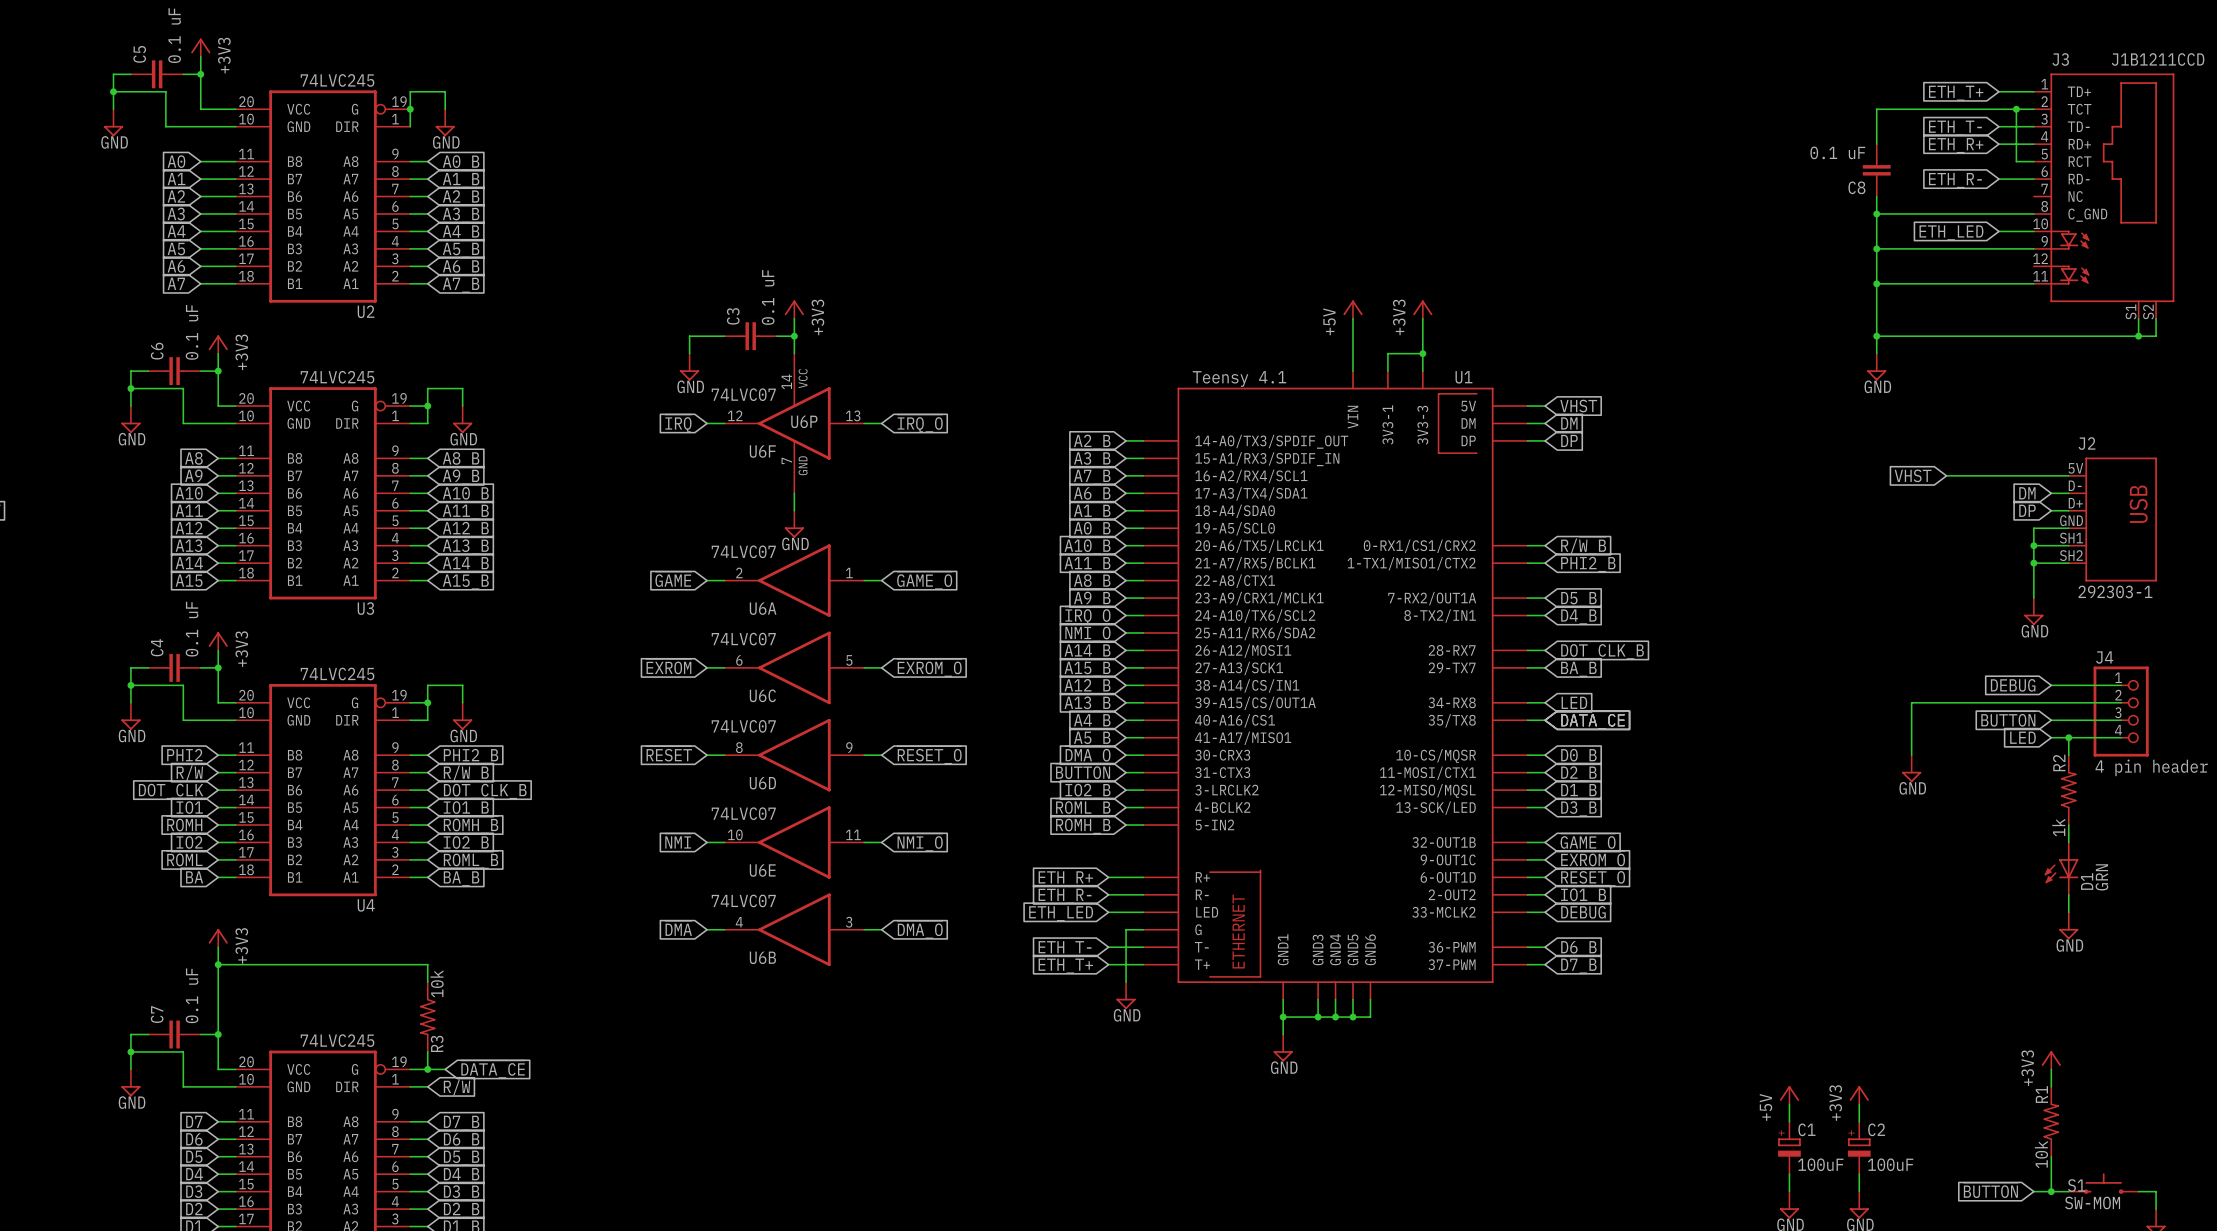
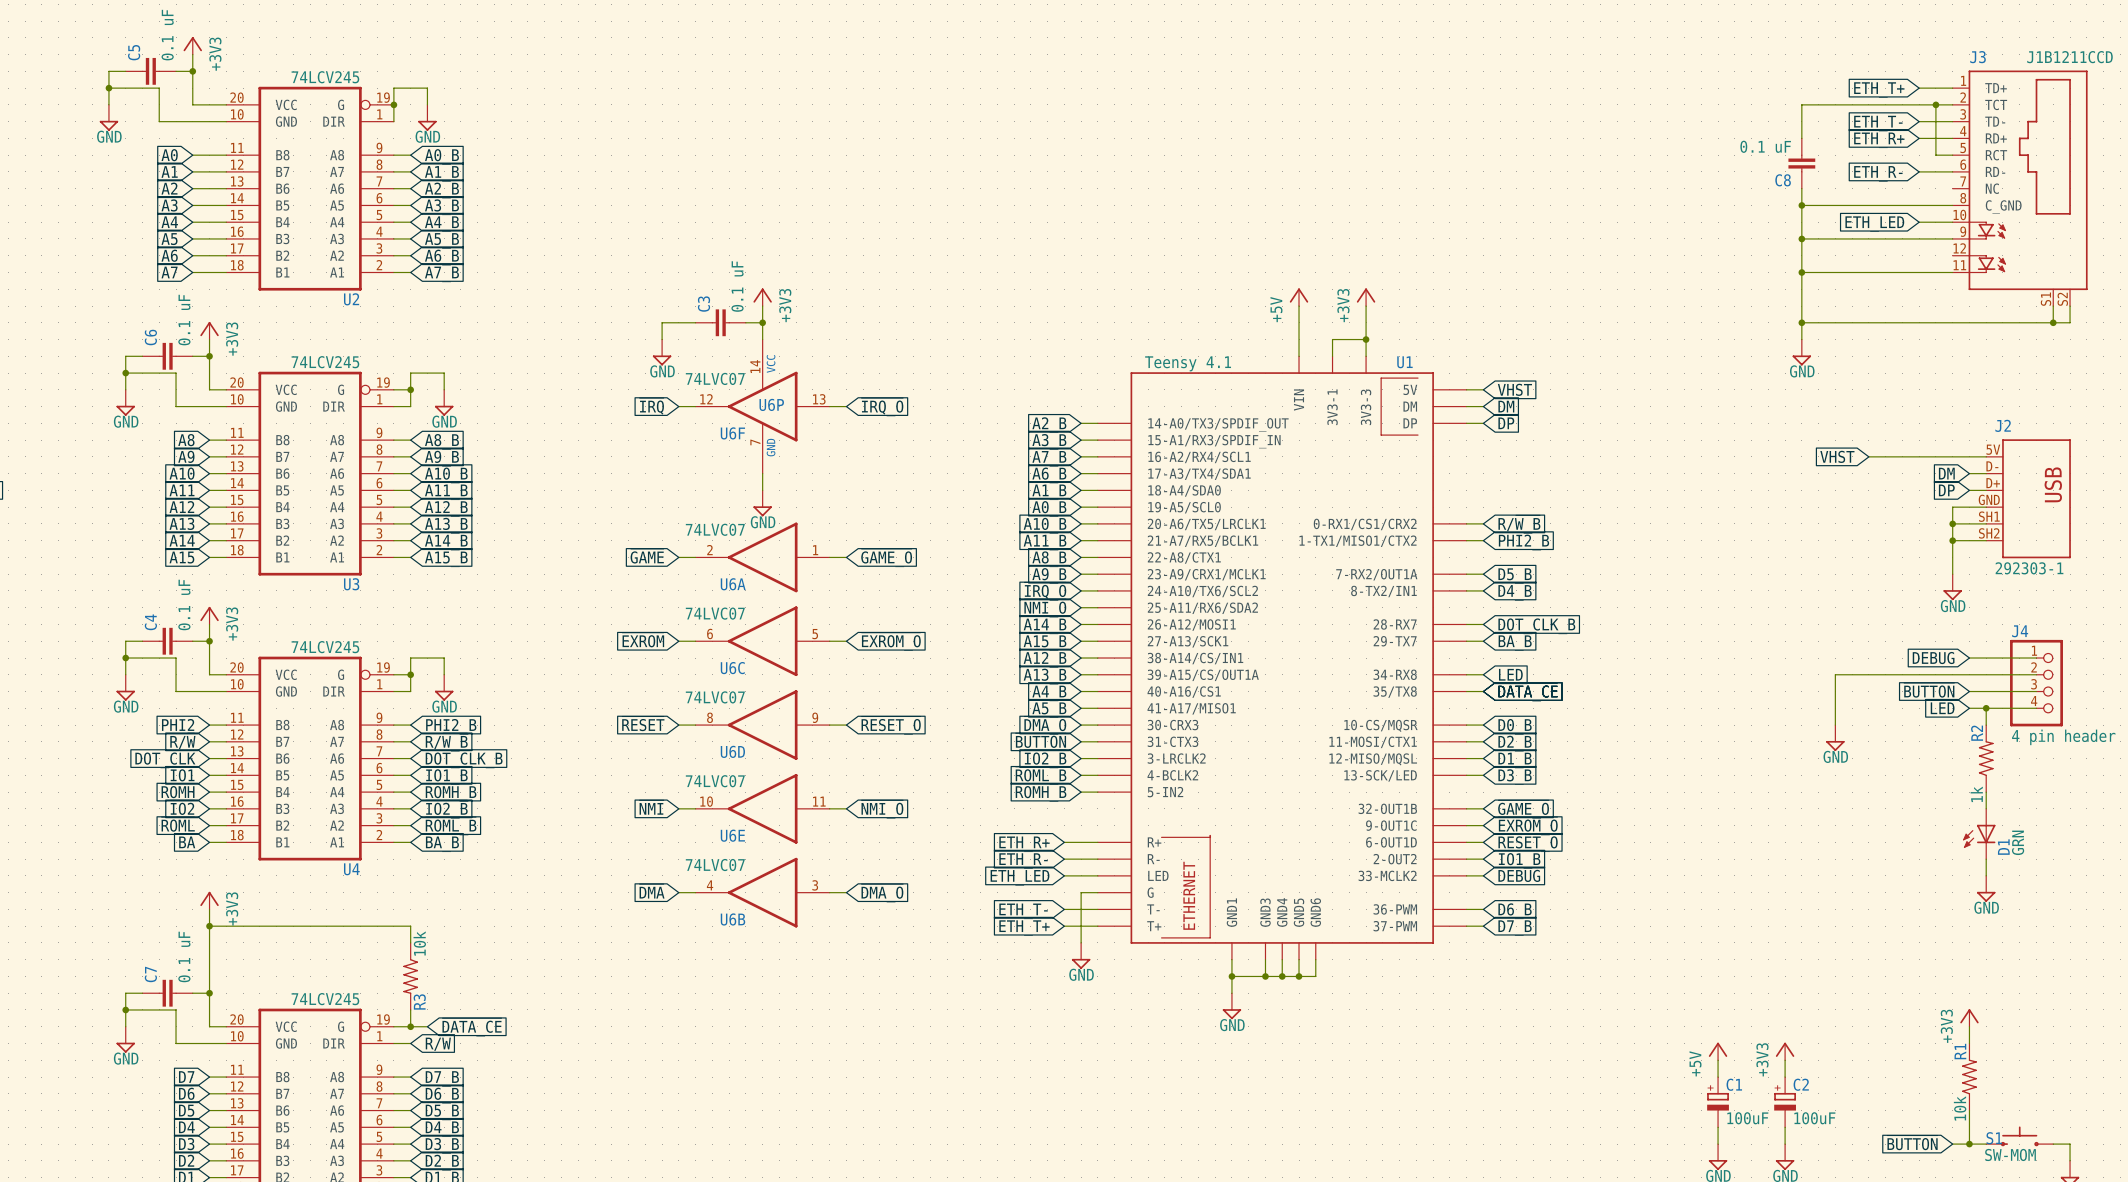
U2 value: 74LVC245 (337, 80) -> 74LCV245 (325, 77)
U3 value: 74LVC245 (337, 377) -> 74LCV245 (325, 362)
U4 value: 74LVC245 (337, 674) -> 74LCV245 (325, 647)
part value: 74LVC245 (337, 1040) -> 74LCV245 (325, 999)

